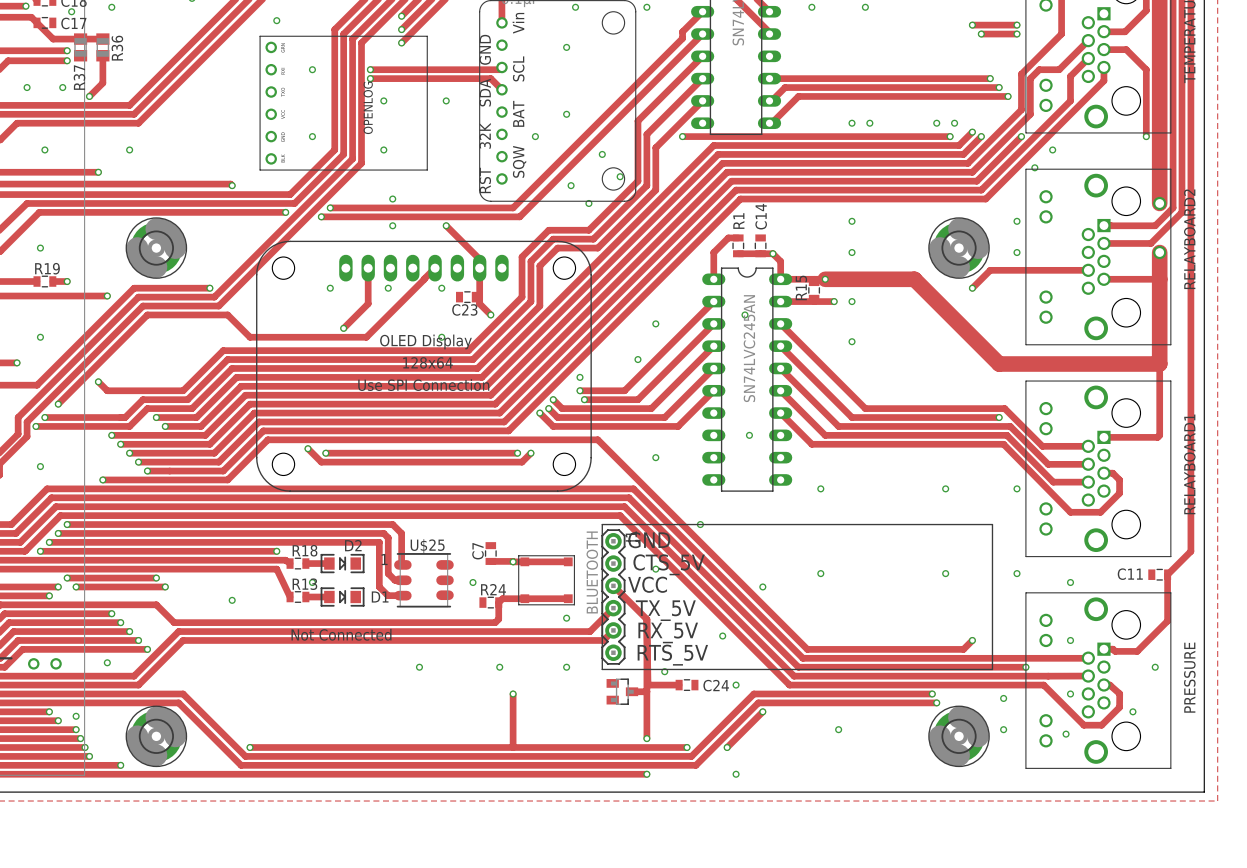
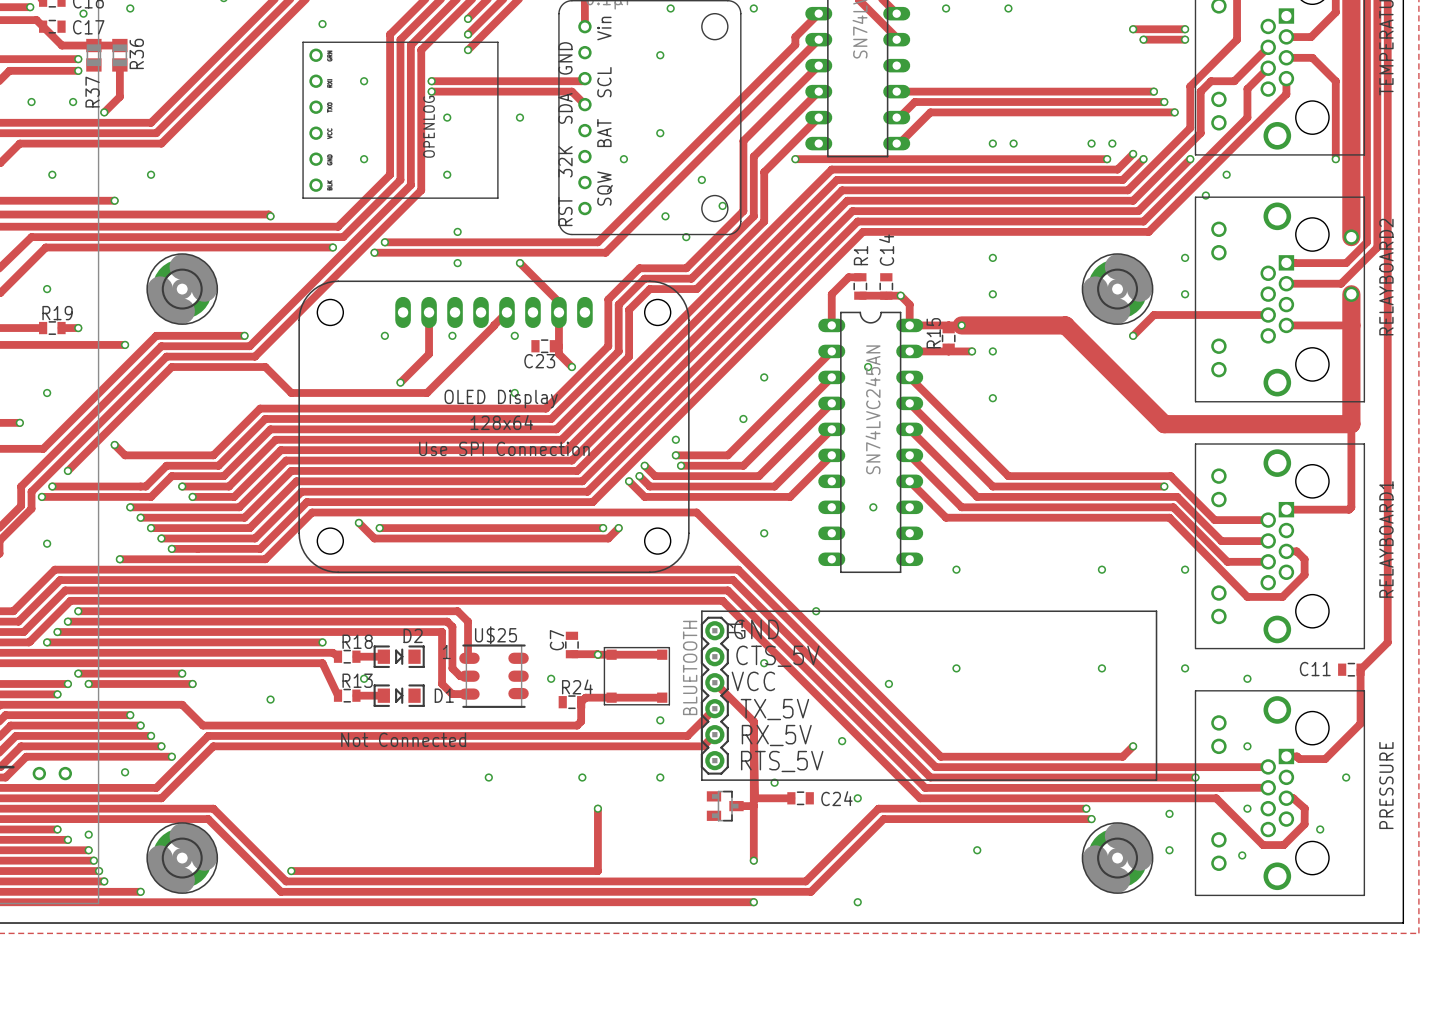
track: (762, 711) (727, 747) -> none
via: (762, 711) -> none
track: (513, 747) (687, 747) -> none
via: (687, 747) -> none
via: (727, 747) -> none

